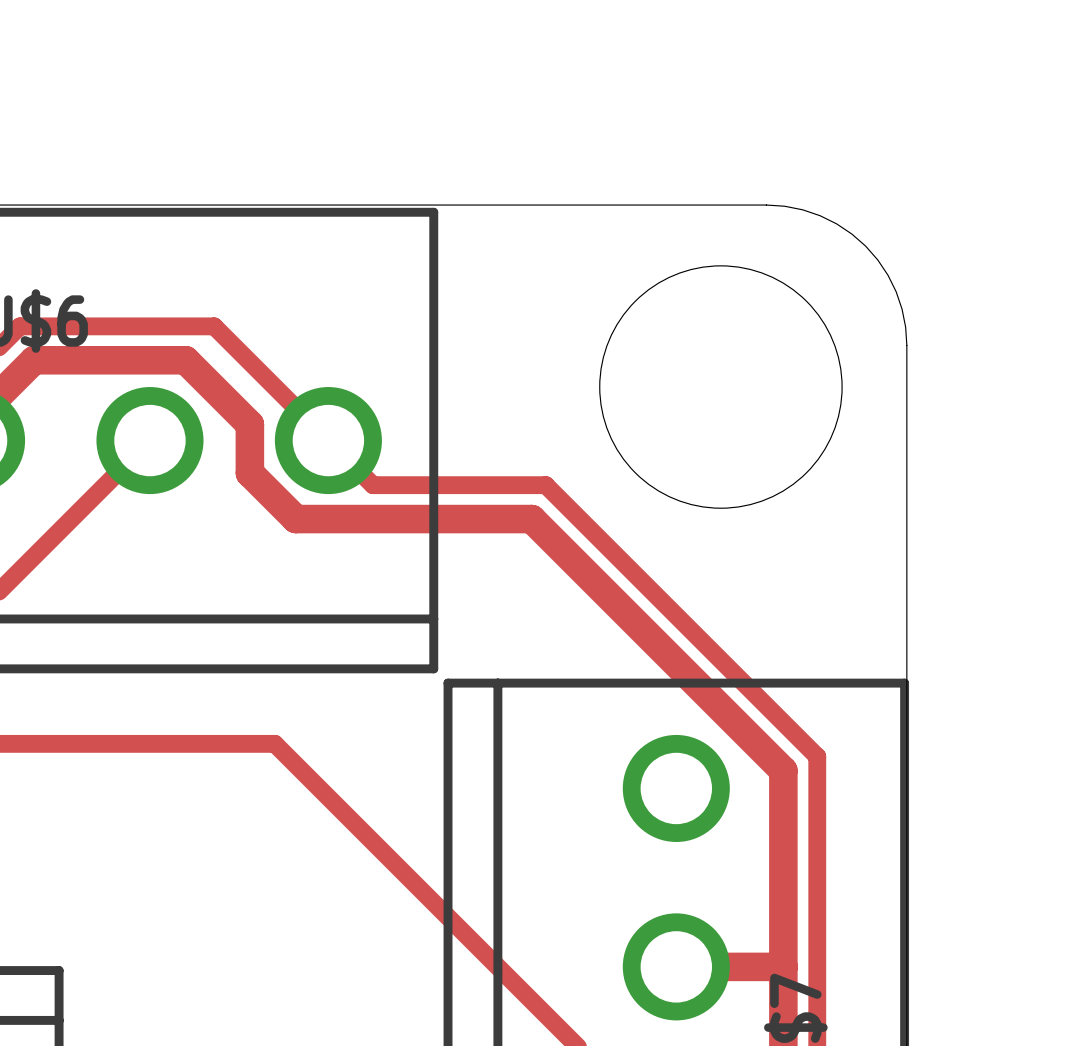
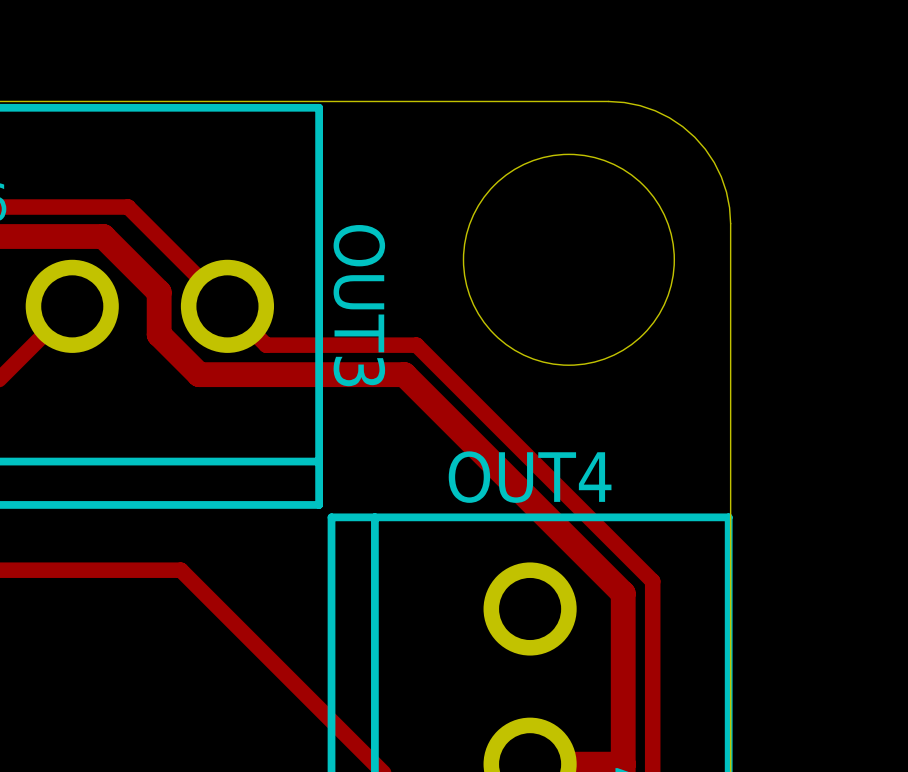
text: none -> OUT3 (359, 305)
text: none -> OUT4 (530, 477)

